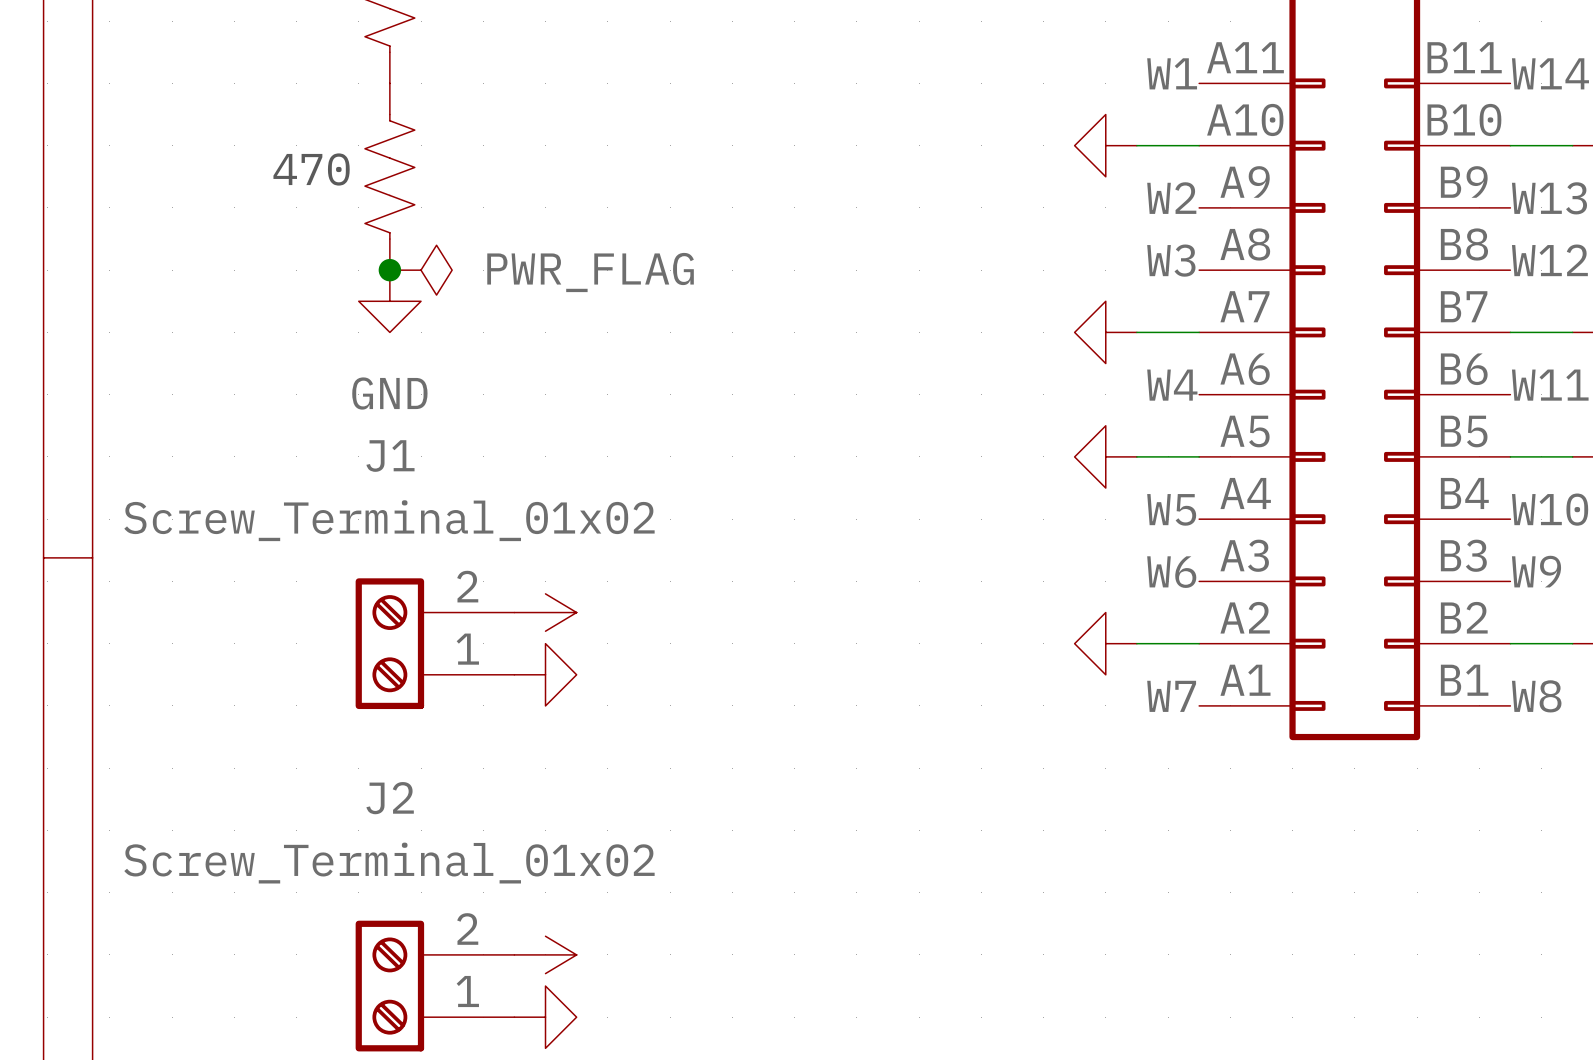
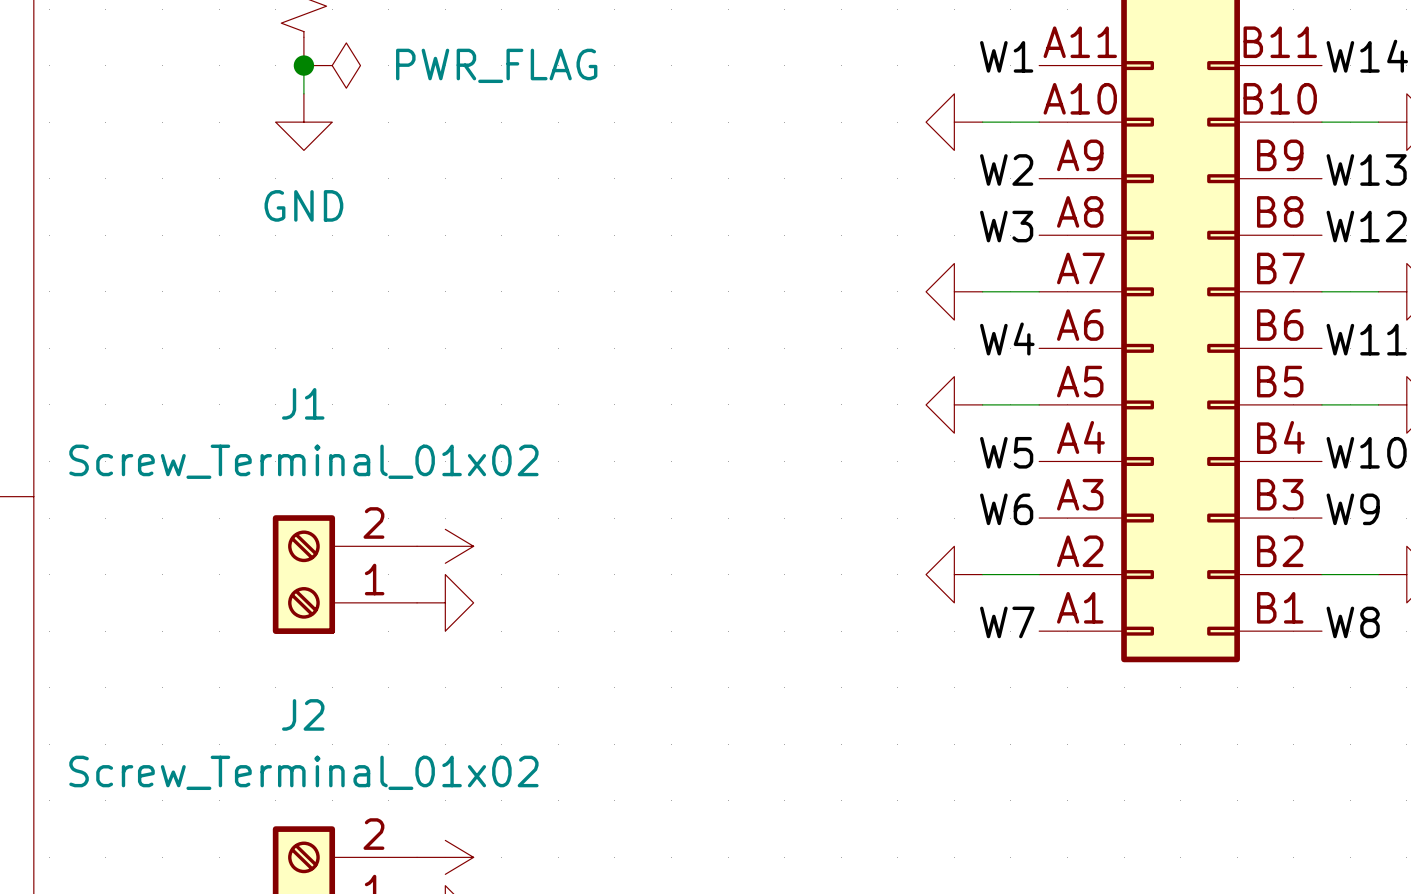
junction: none -> (303, 65)
text: 470 (311, 169) -> none
part: (389, 176) -> none
junction: (389, 270) -> none
power symbol position: PWR_FLAG (421, 270) -> PWR_FLAG (332, 65)
power symbol position: GND (389, 301) -> GND (303, 122)

